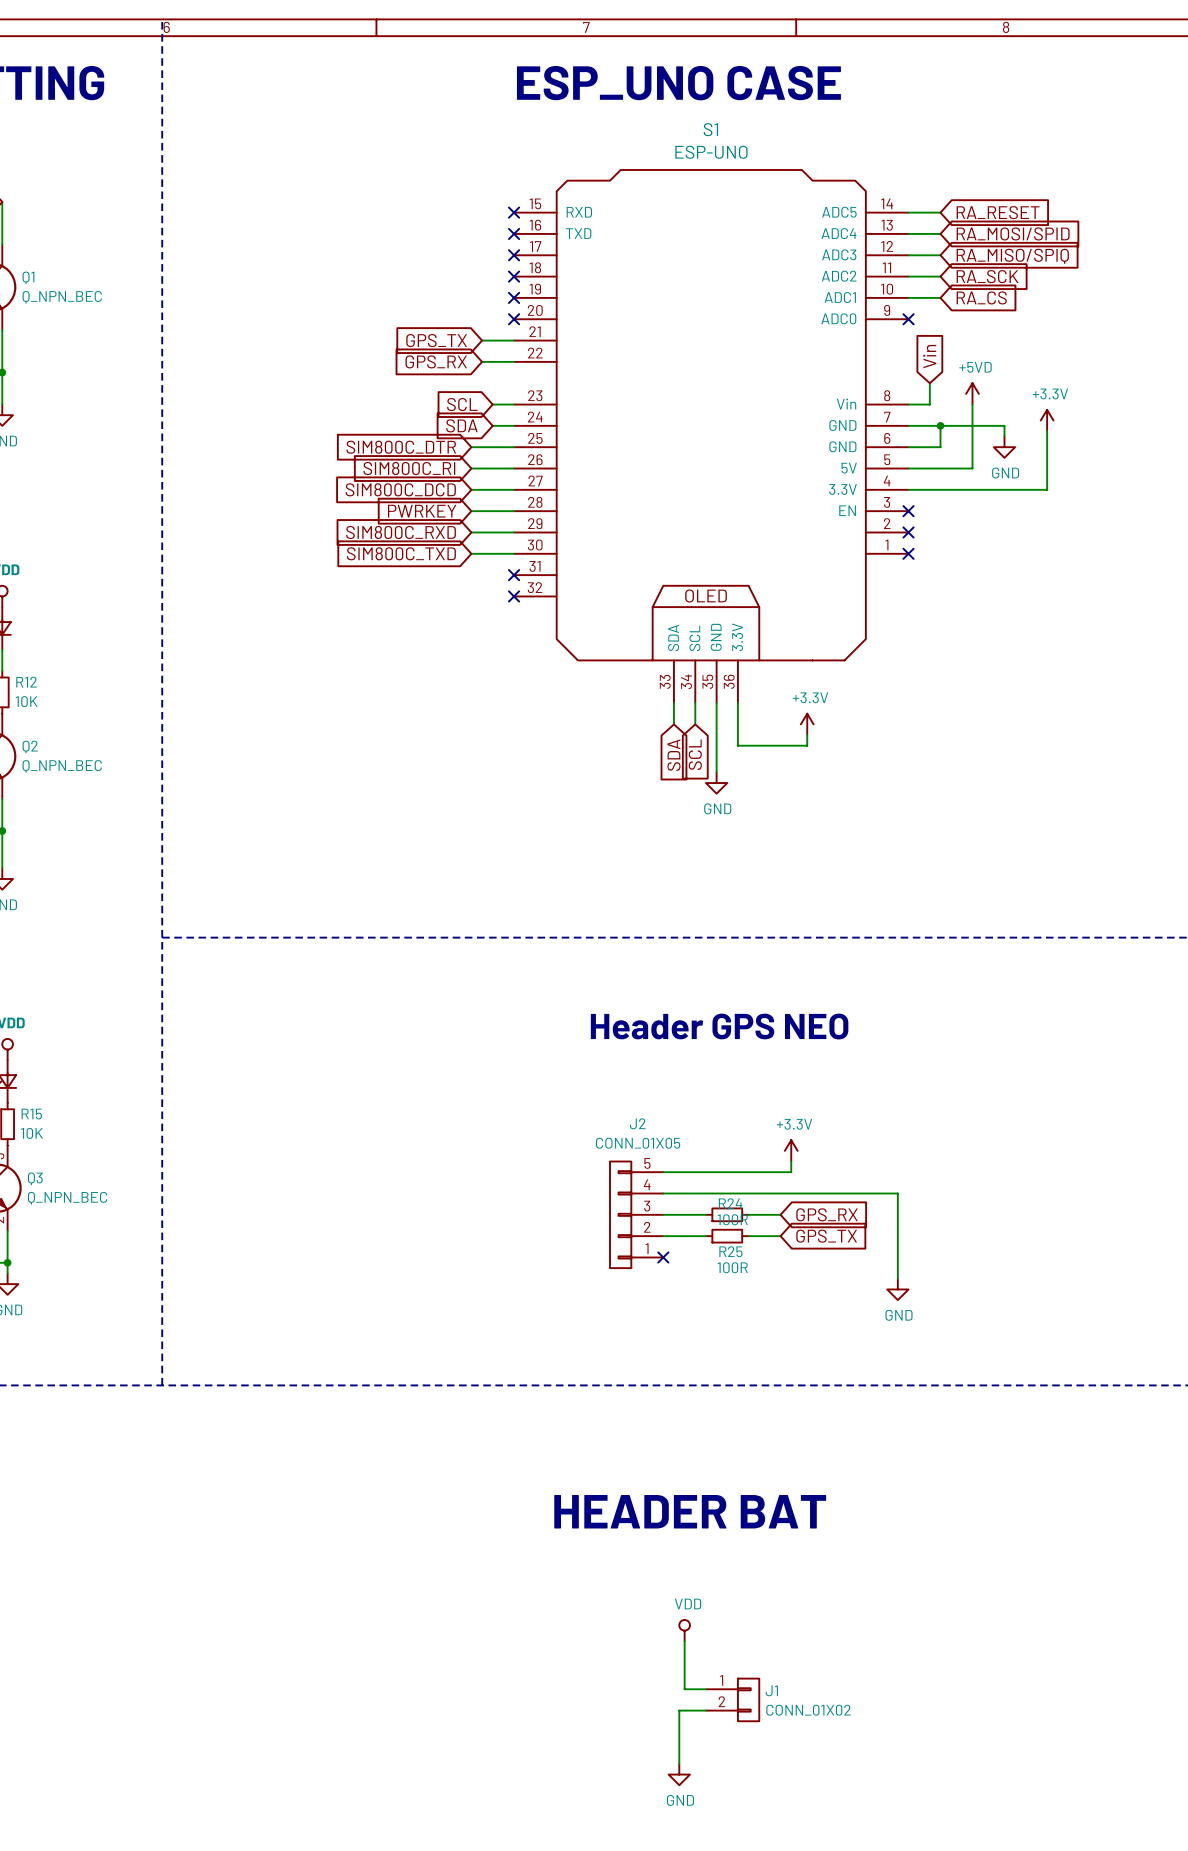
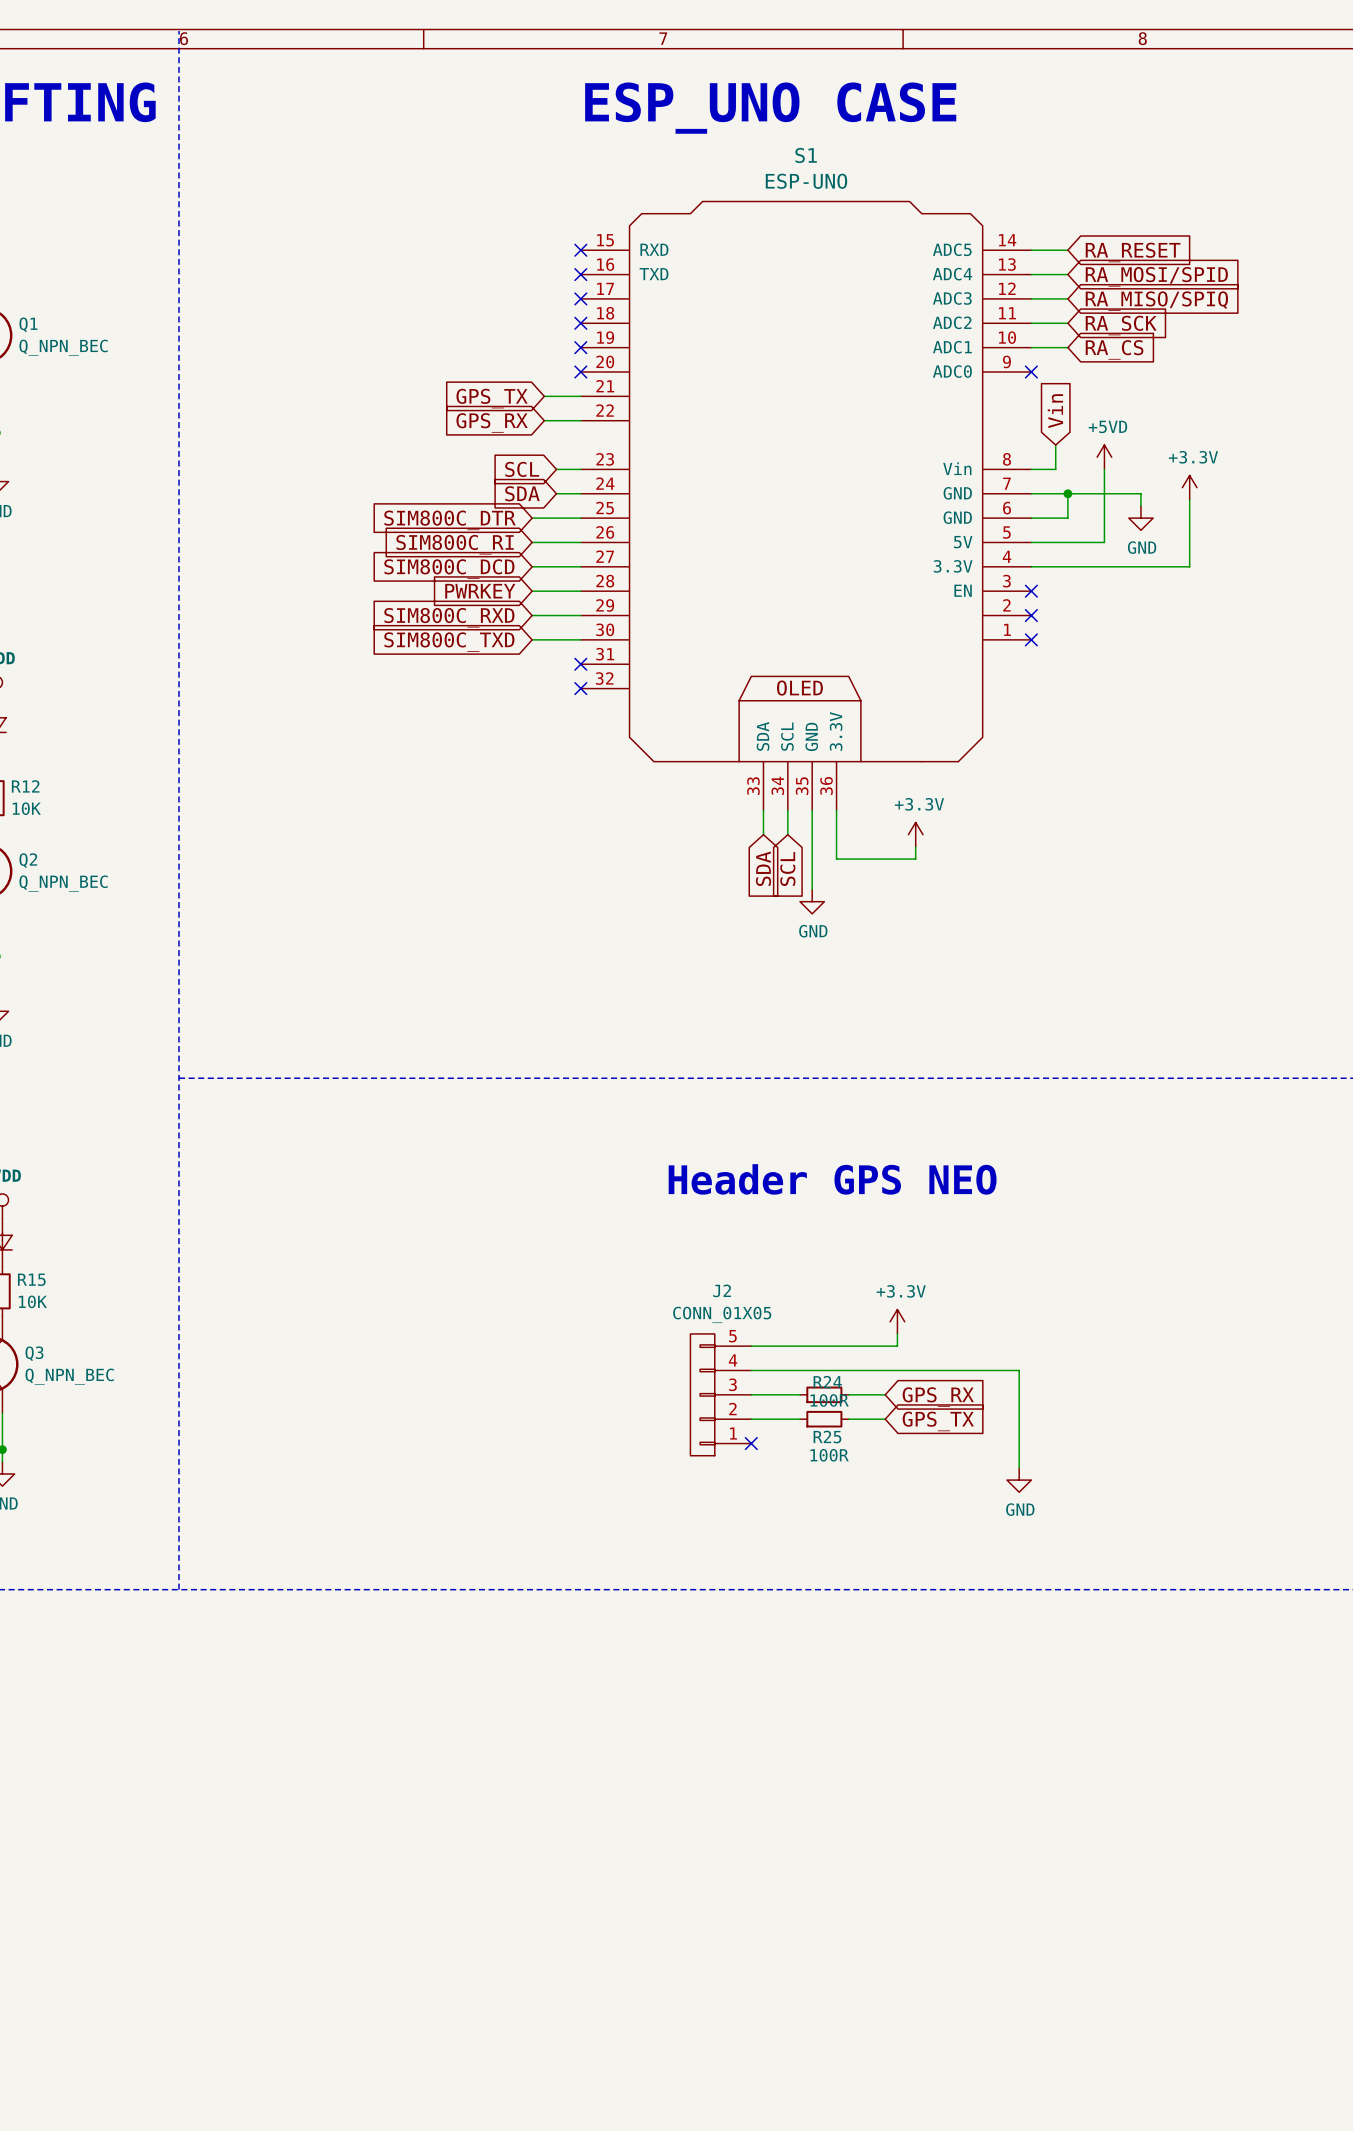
text: HEADER BAT (690, 1511) -> none
power symbol: VDD (684, 1630) -> none
wire: (684, 1641) (684, 1689) (705, 1689) -> none
J1: CONN_01X02 (732, 1699) -> none
wire: (705, 1710) (679, 1710) (679, 1763) -> none
power symbol: GND (679, 1774) -> none

